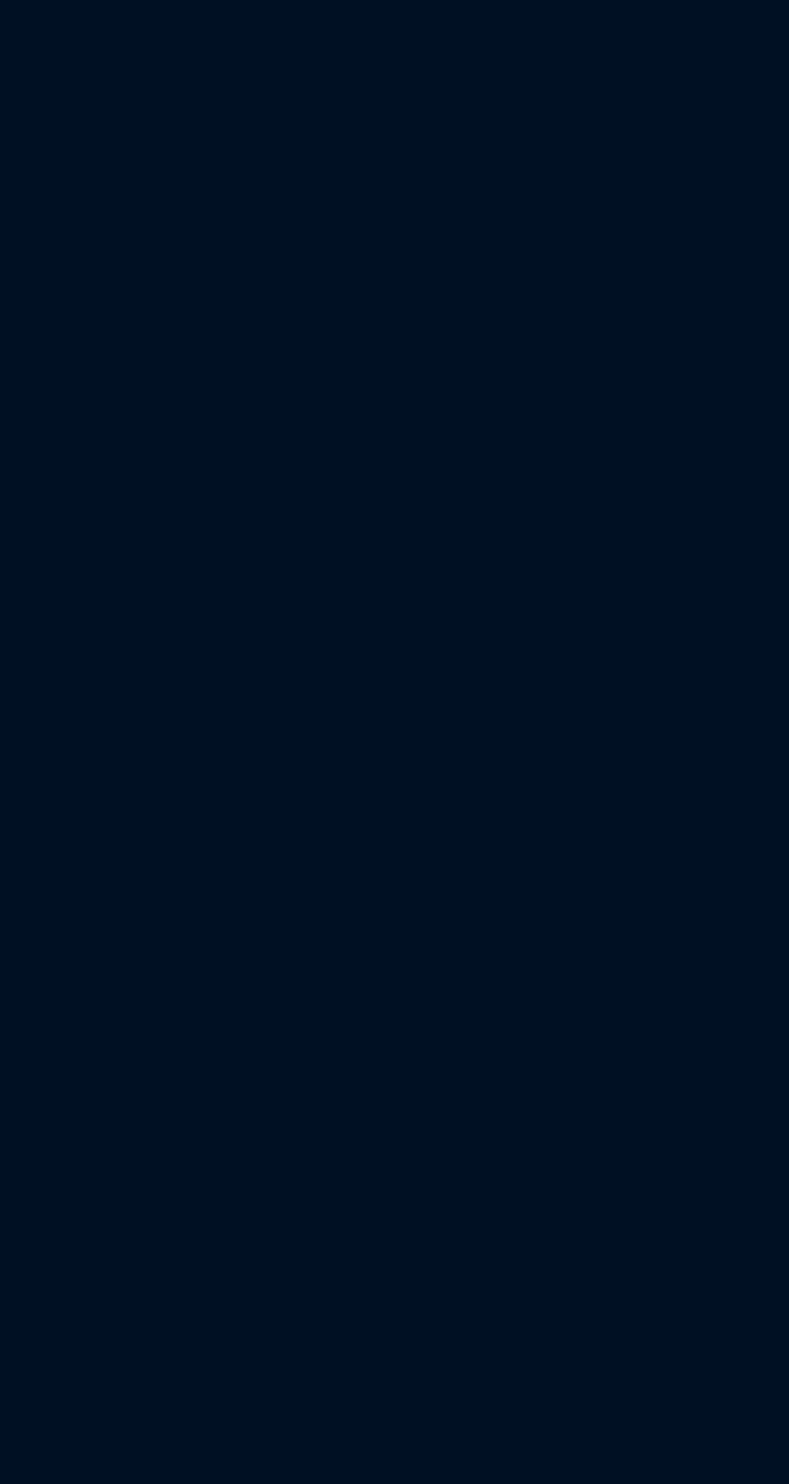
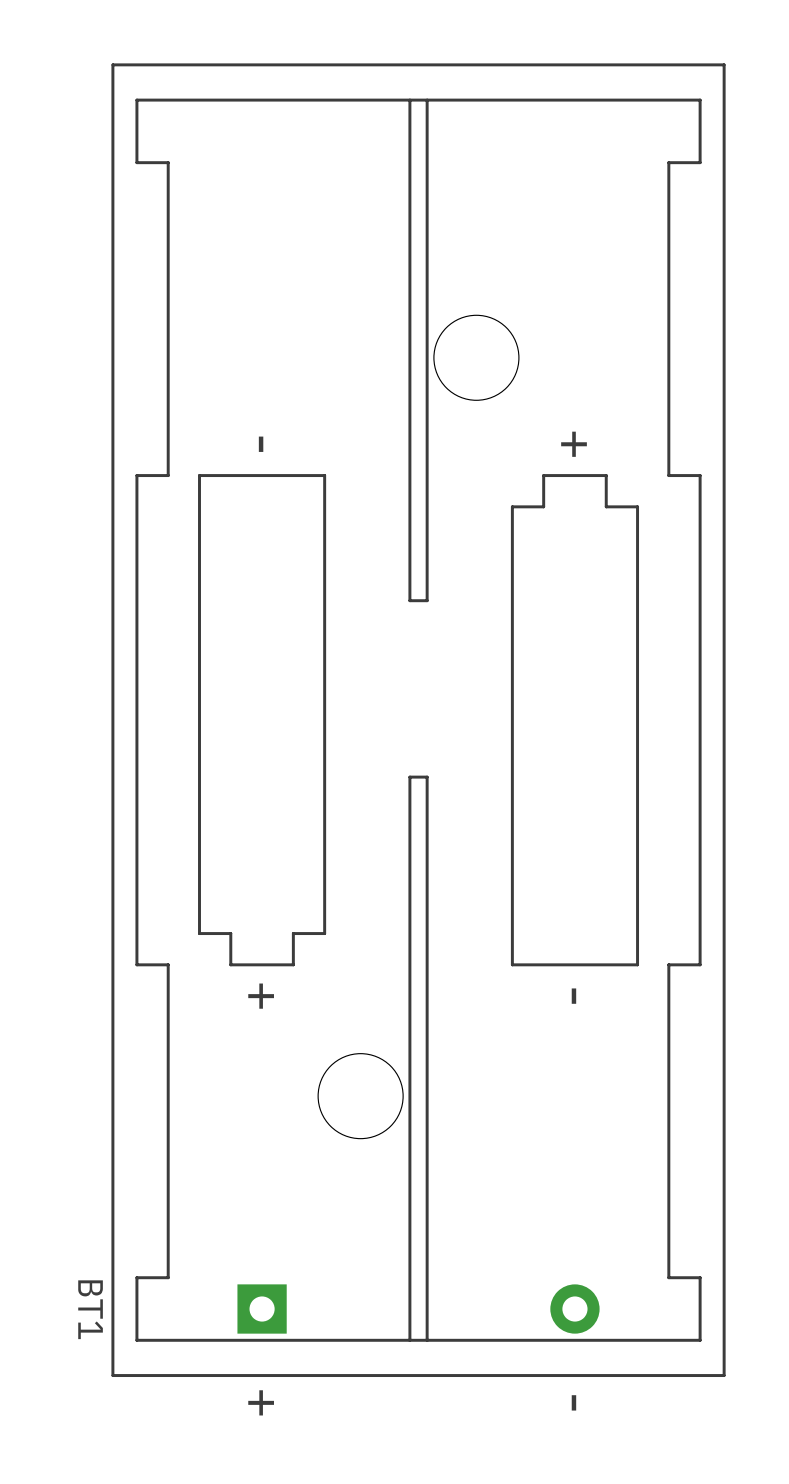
BT1: none -> (418, 720)

